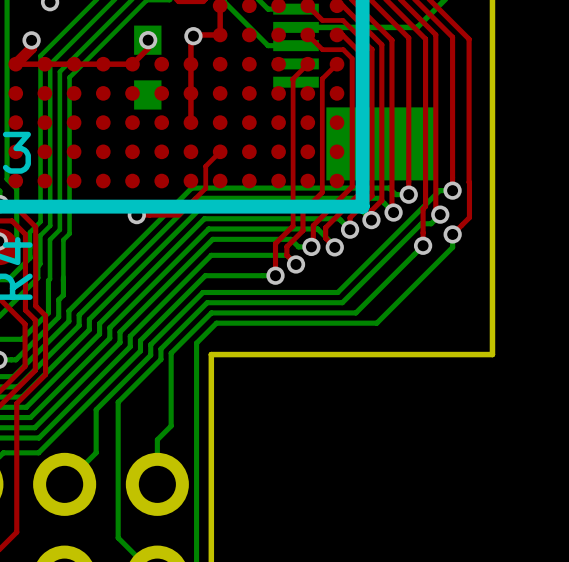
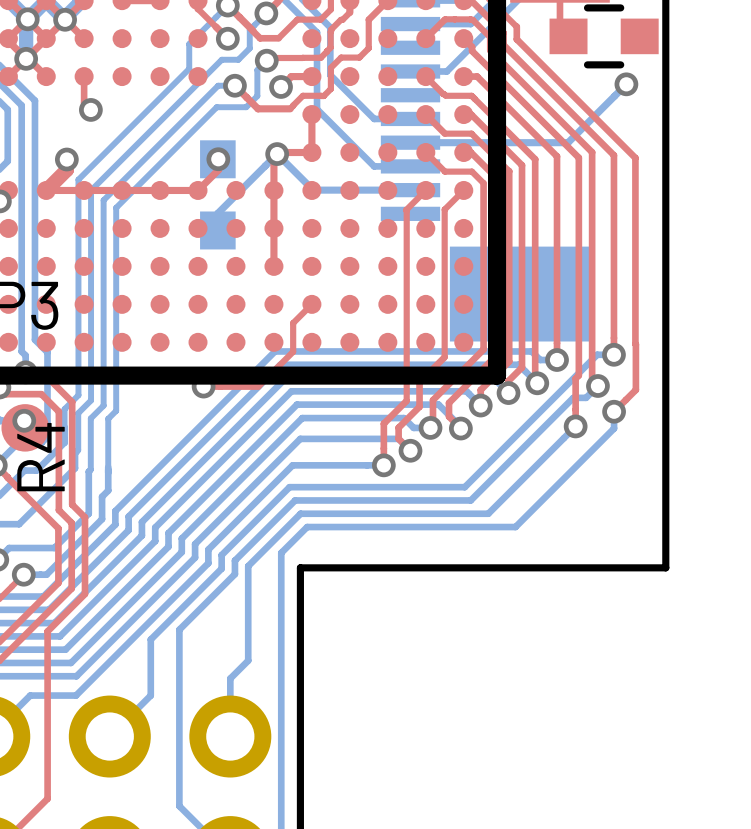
bottom track: none -> (410, 190) (313, 190) (277, 154) (217, 213) (217, 230)

